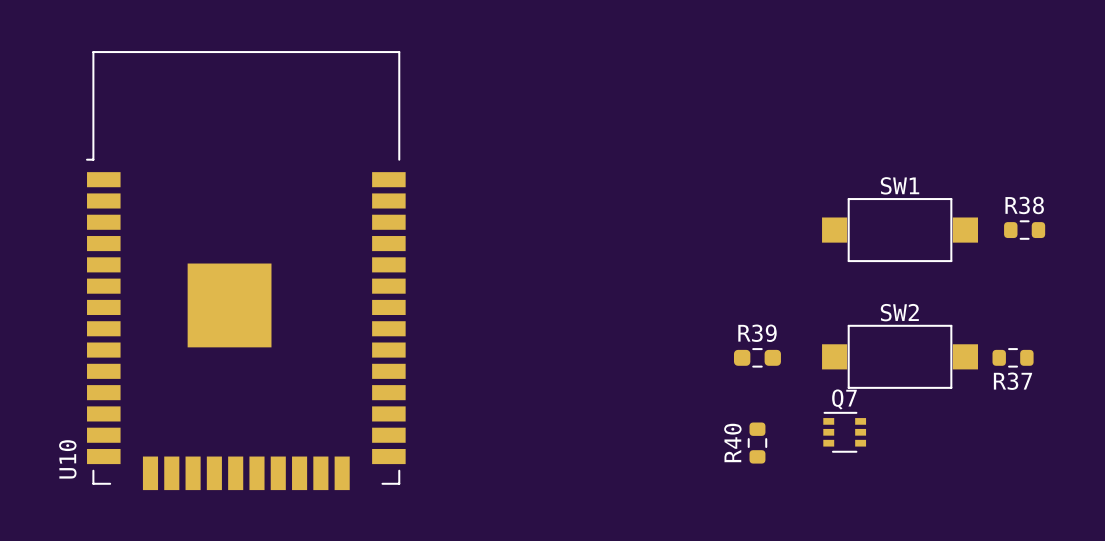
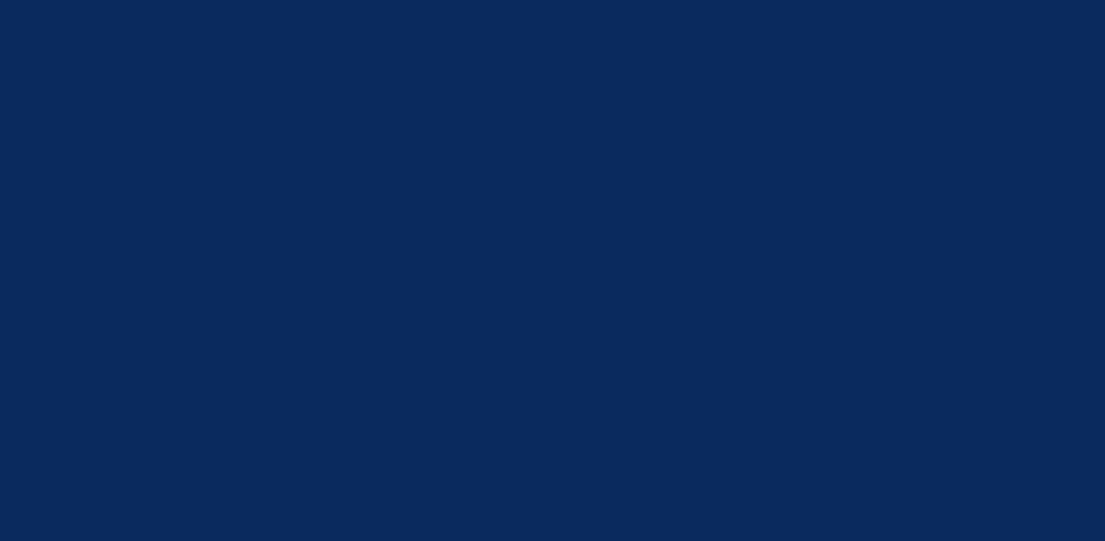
SW1: (900, 230) -> none
R38: (1024, 230) -> none
U10: (245, 270) -> none
SW2: (900, 356) -> none
R39: (757, 357) -> none
R37: (1013, 357) -> none
Q7: (844, 432) -> none
R40: (757, 443) -> none

